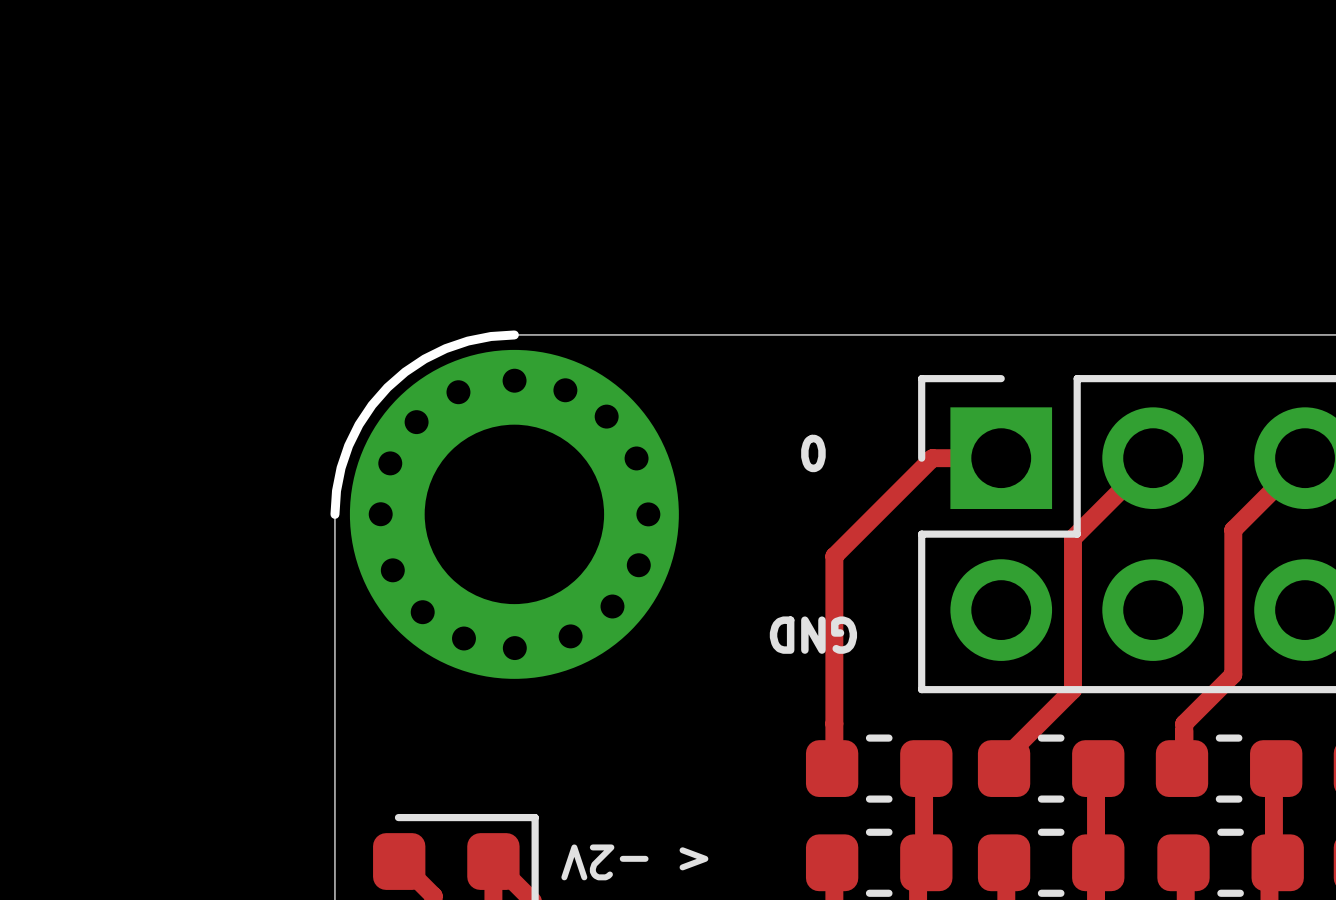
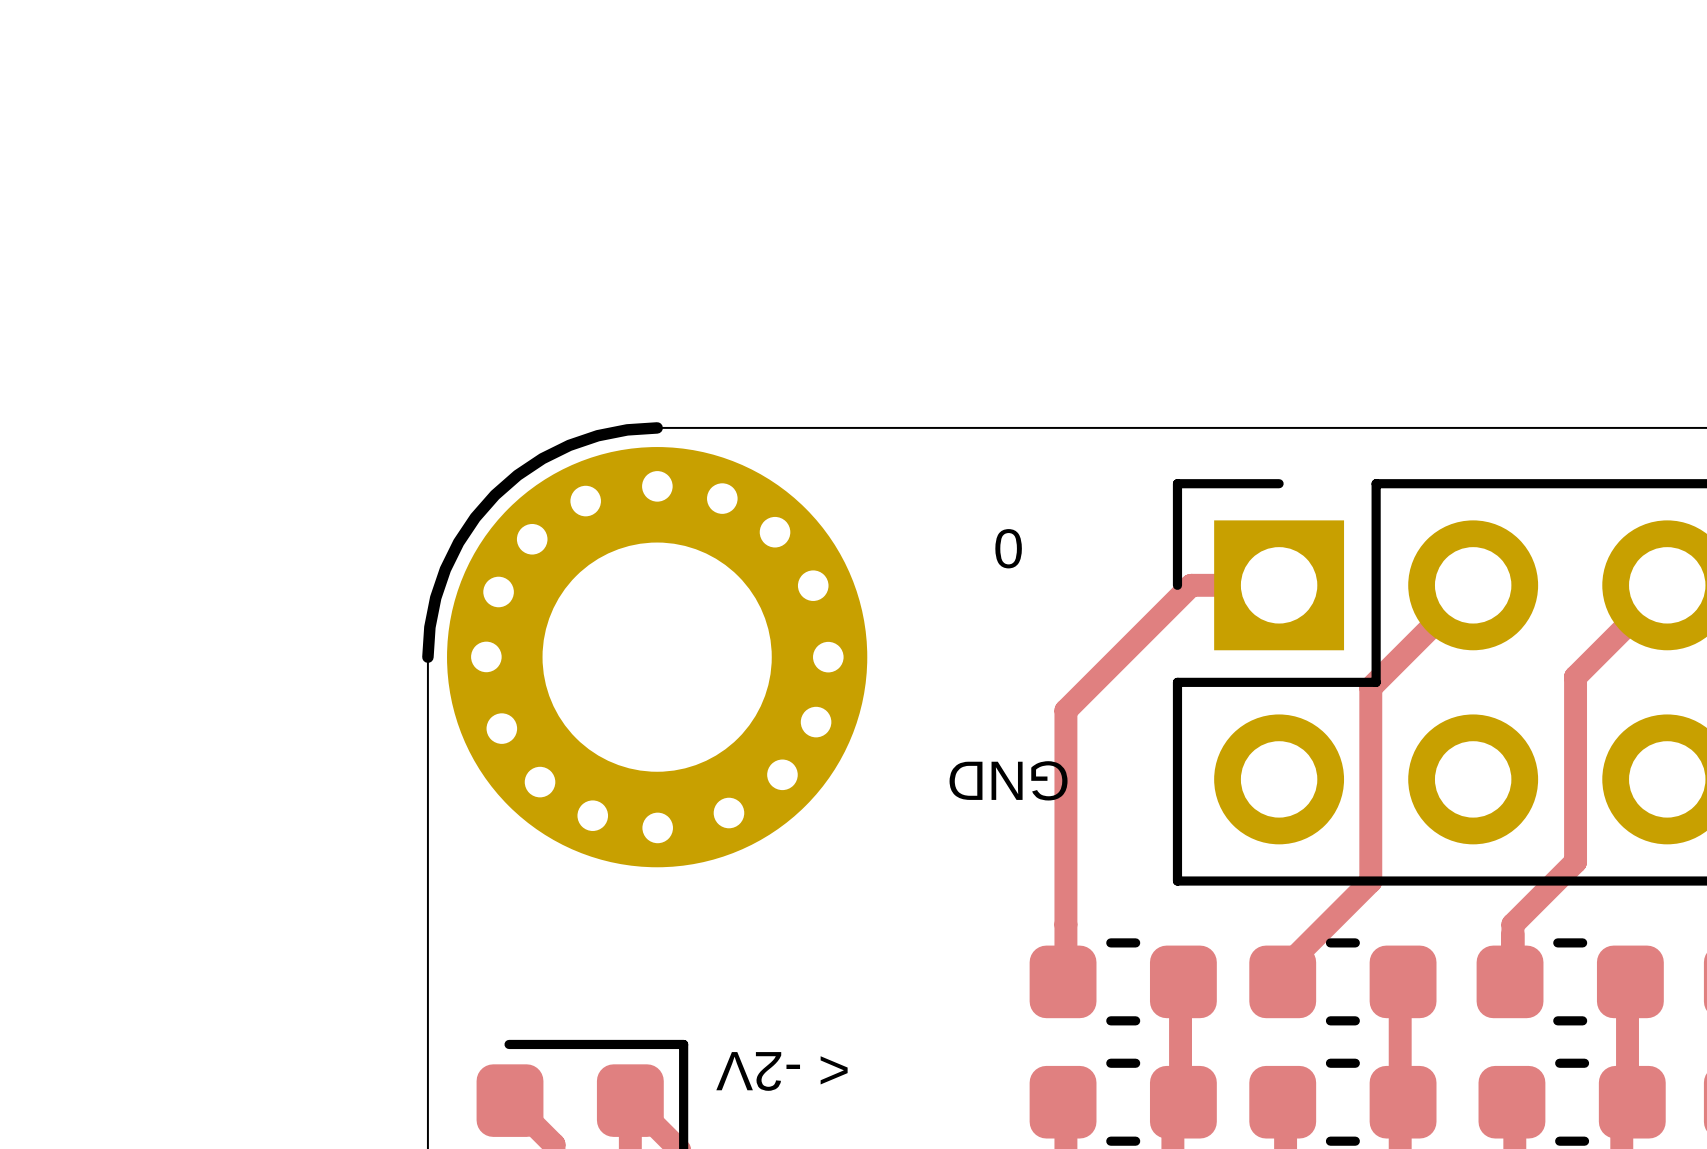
text position: 0 (813, 453) -> 0 (1008, 548)
text position: GND (813, 635) -> GND (1008, 780)
text position: < -2V (634, 862) -> < -2V (781, 1071)

